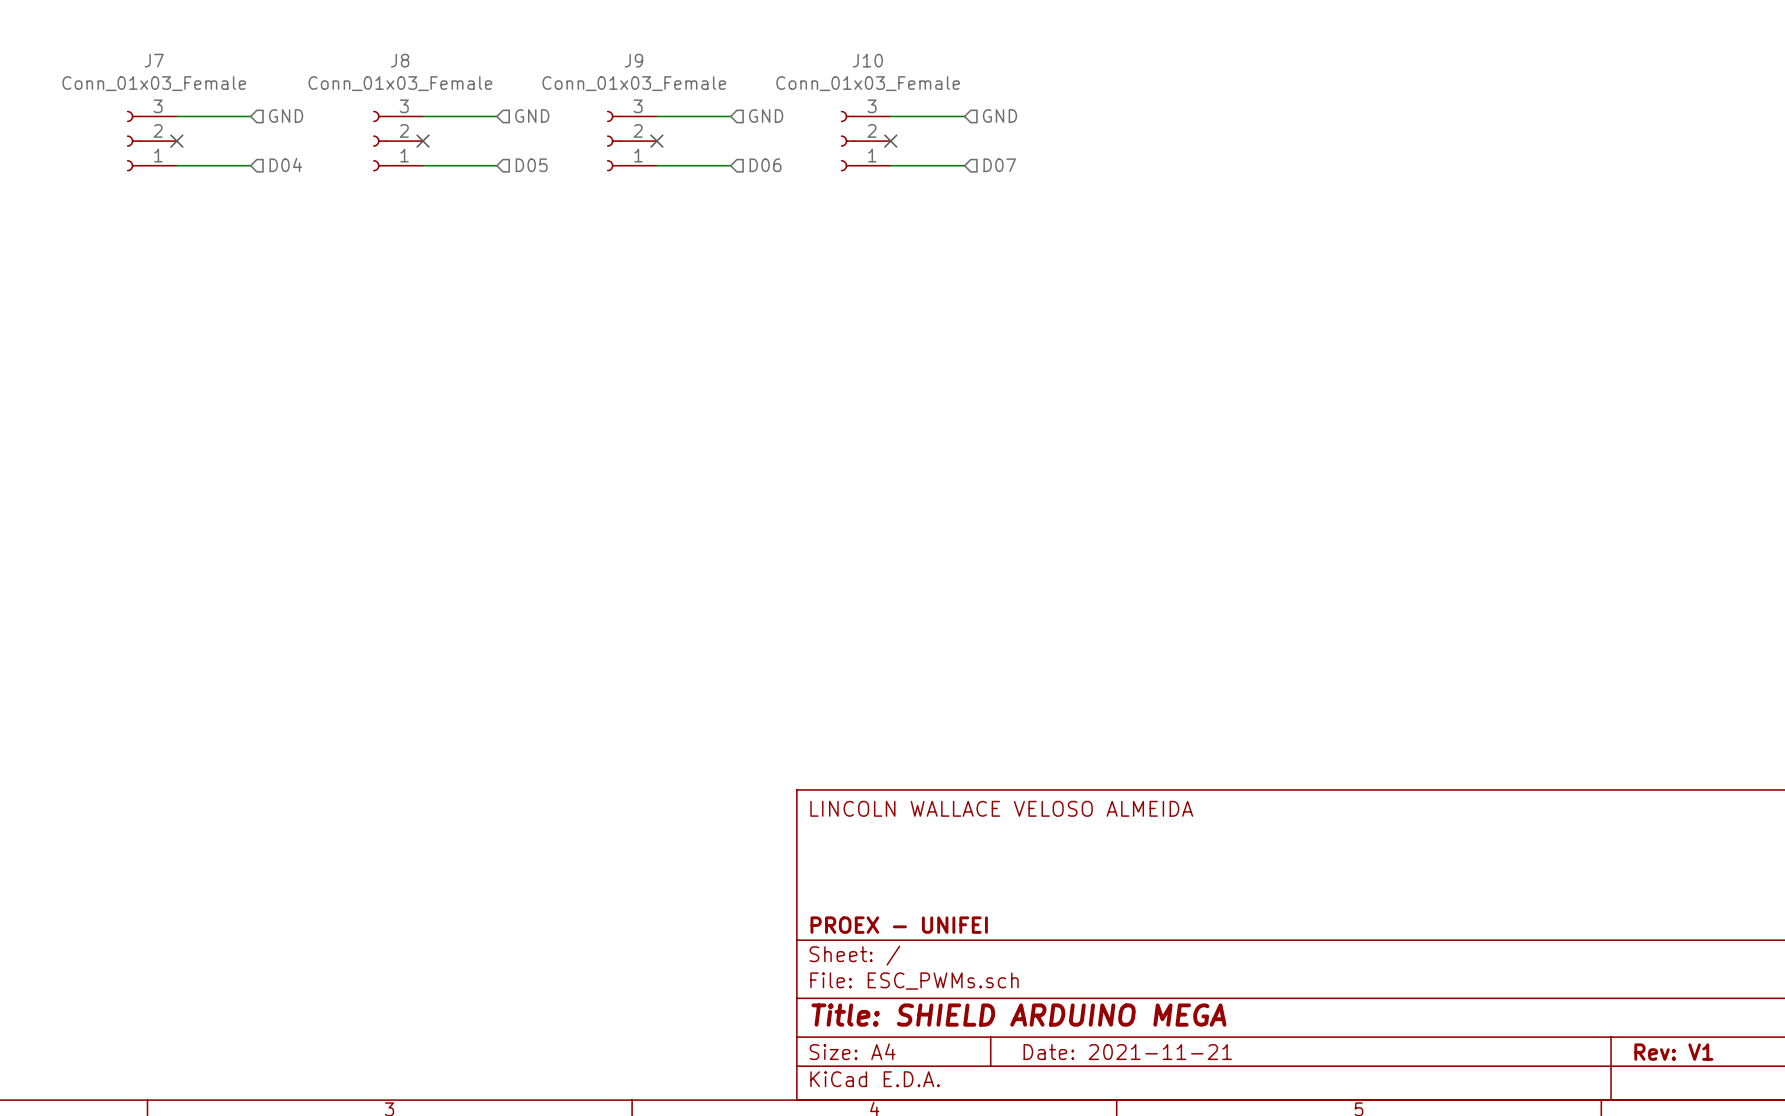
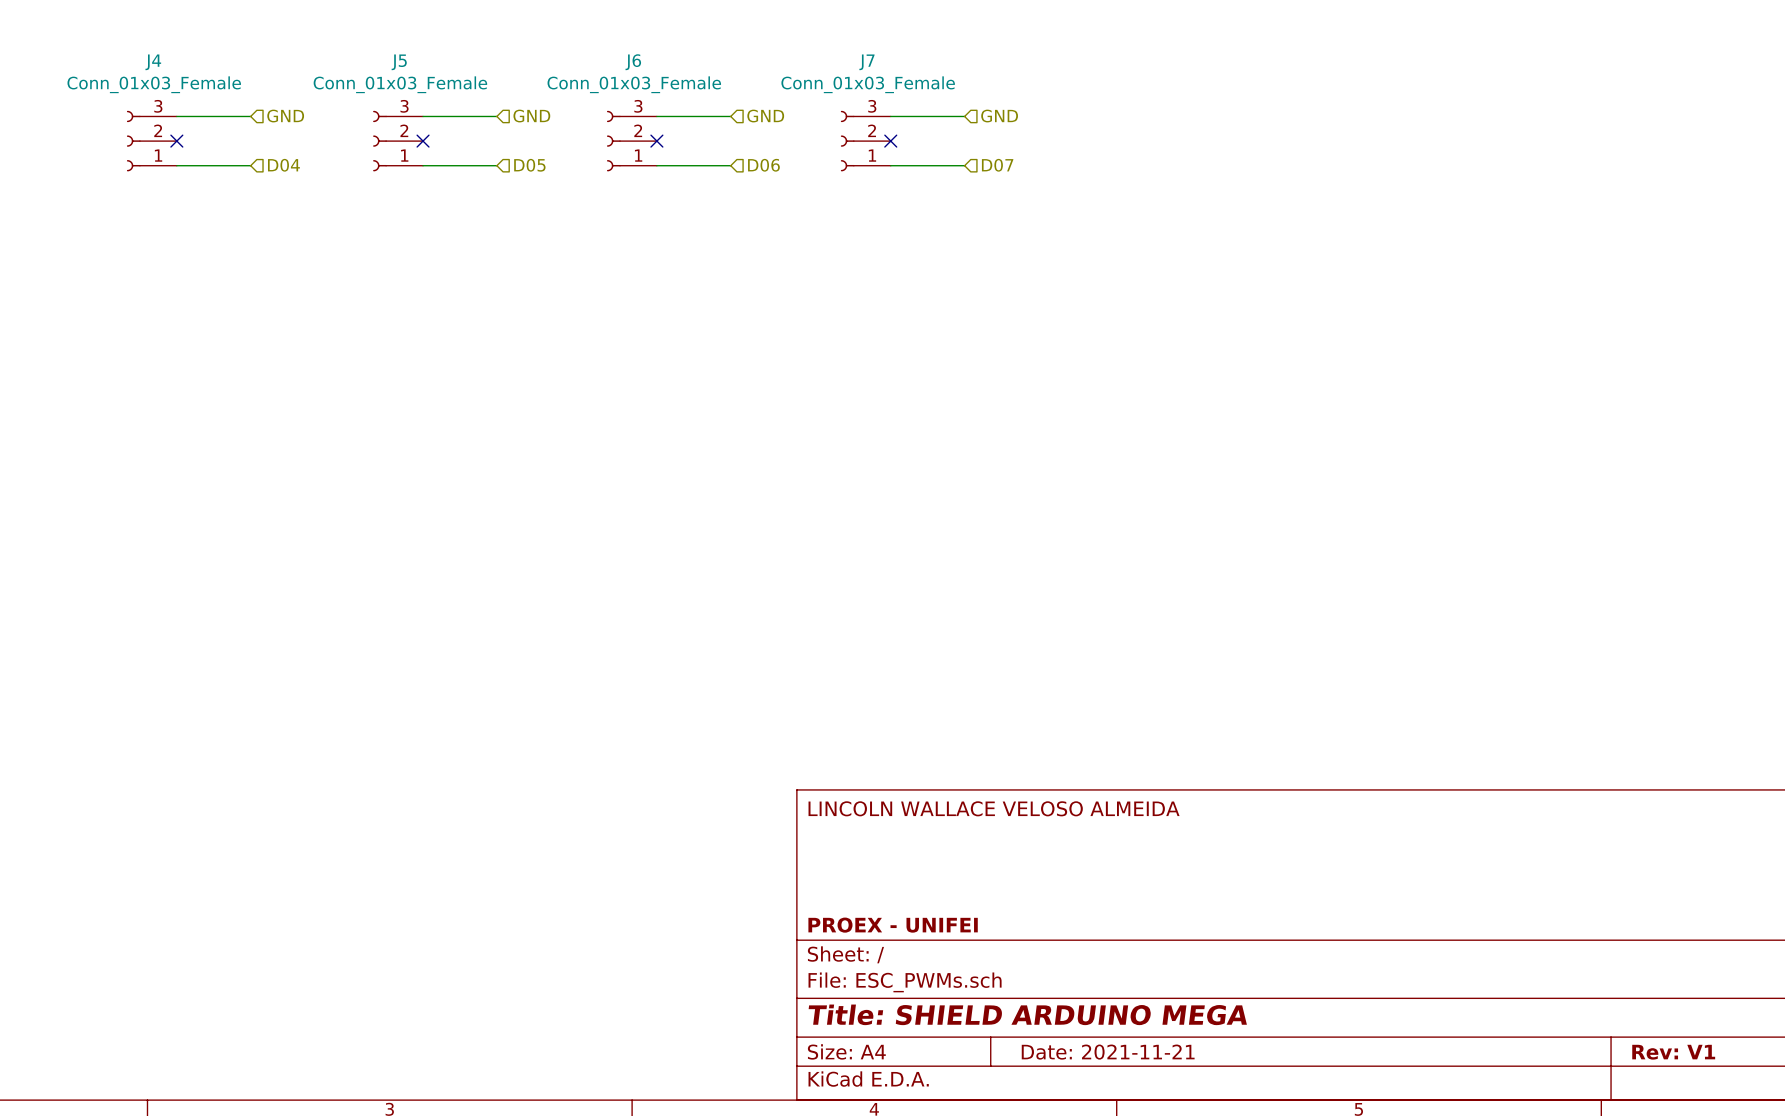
J7 name: J7 (154, 60) -> J4 (153, 62)
J8 name: J8 (400, 60) -> J5 (399, 62)
J9 name: J9 (633, 60) -> J6 (633, 62)
J10 name: J10 (867, 60) -> J7 (866, 62)

